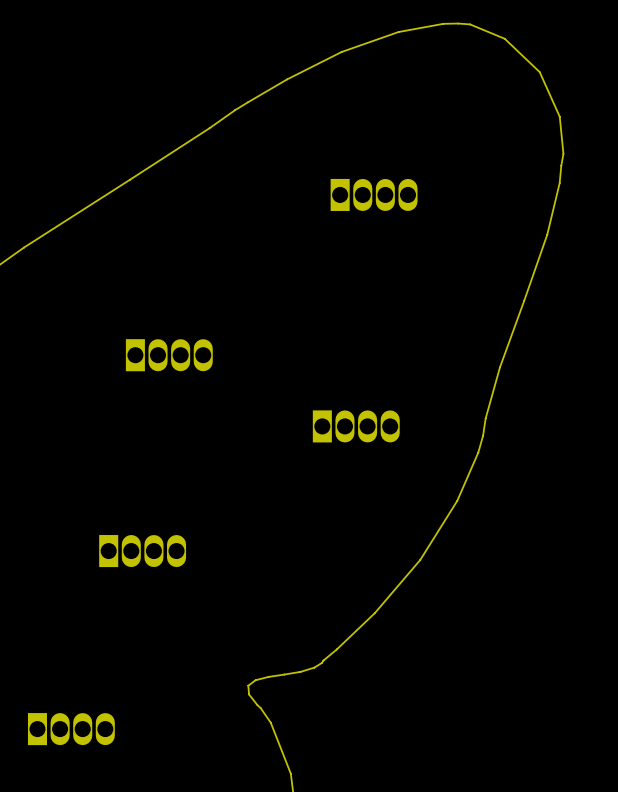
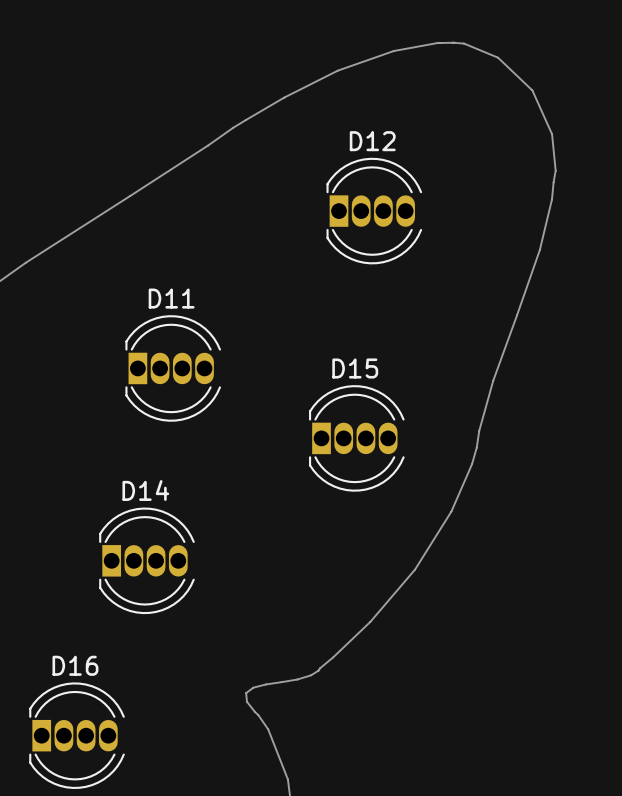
part: (374, 194) -> none
D12: none -> (374, 211)
part: (169, 355) -> none
D11: none -> (173, 368)
part: (356, 426) -> none
D15: none -> (356, 438)
part: (142, 551) -> none
D14: none -> (146, 560)
part: (71, 729) -> none
D16: none -> (77, 735)

